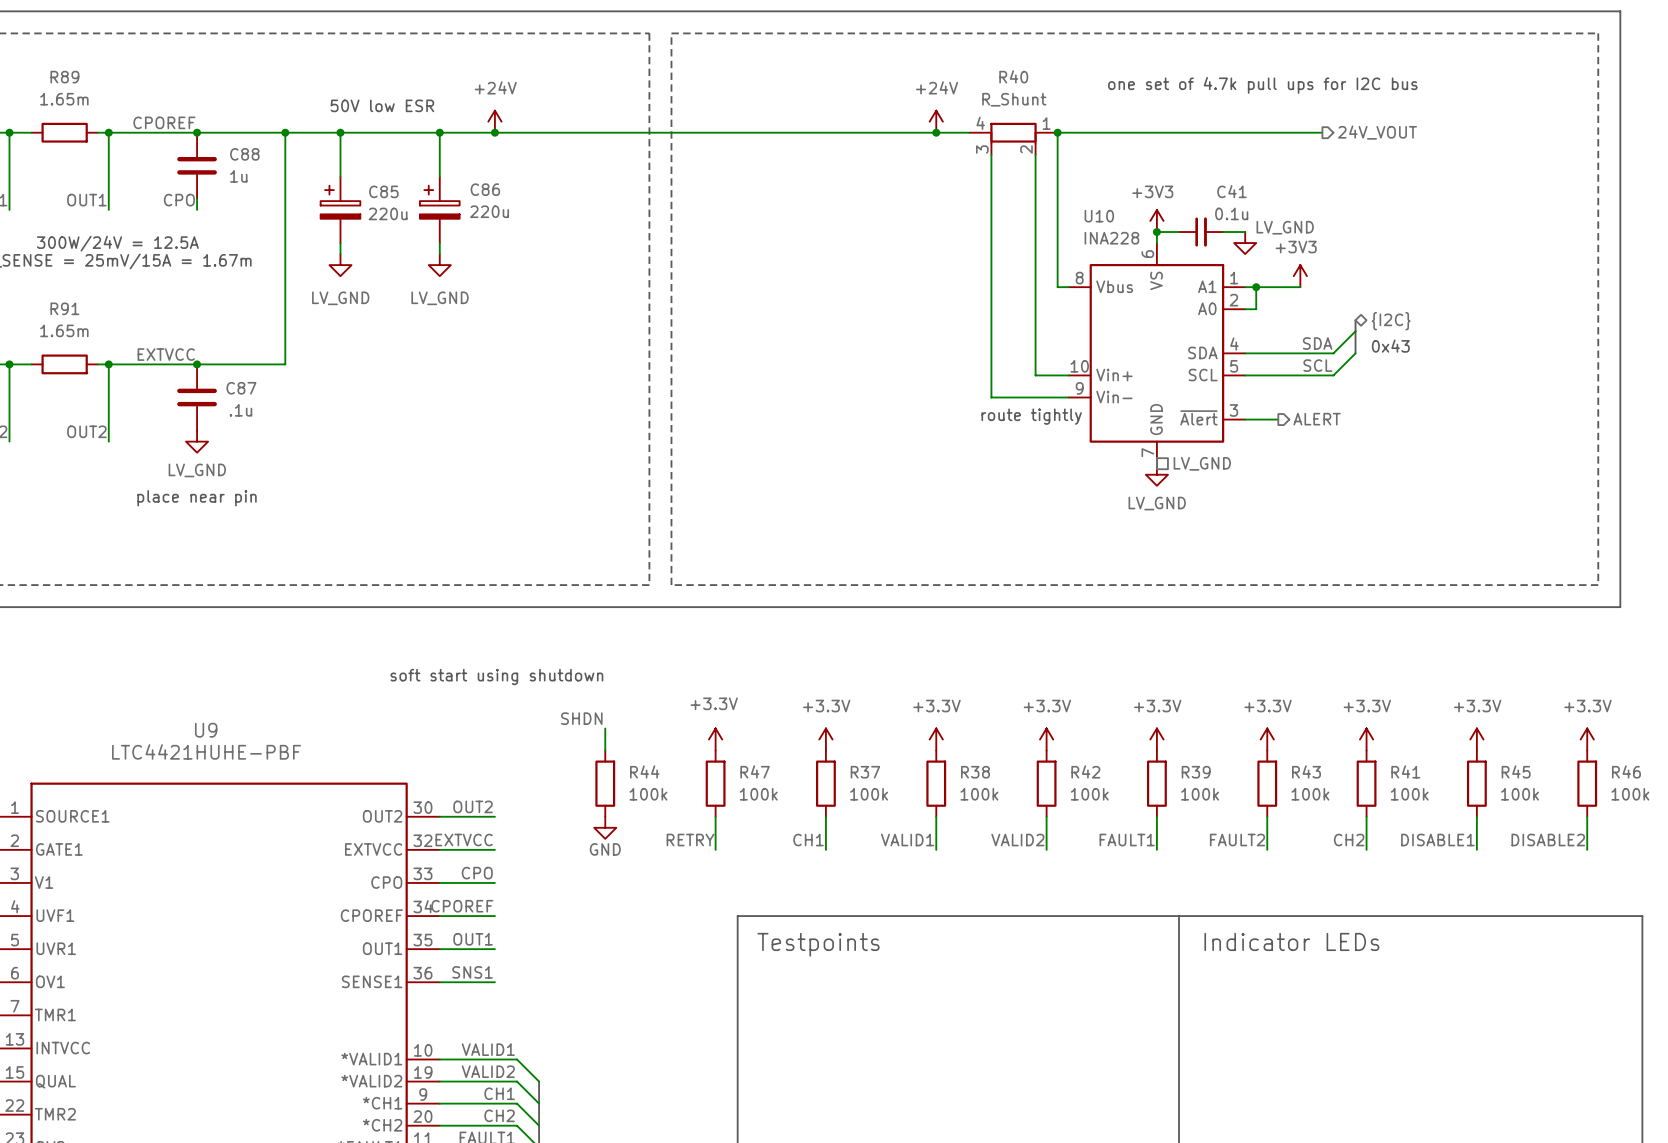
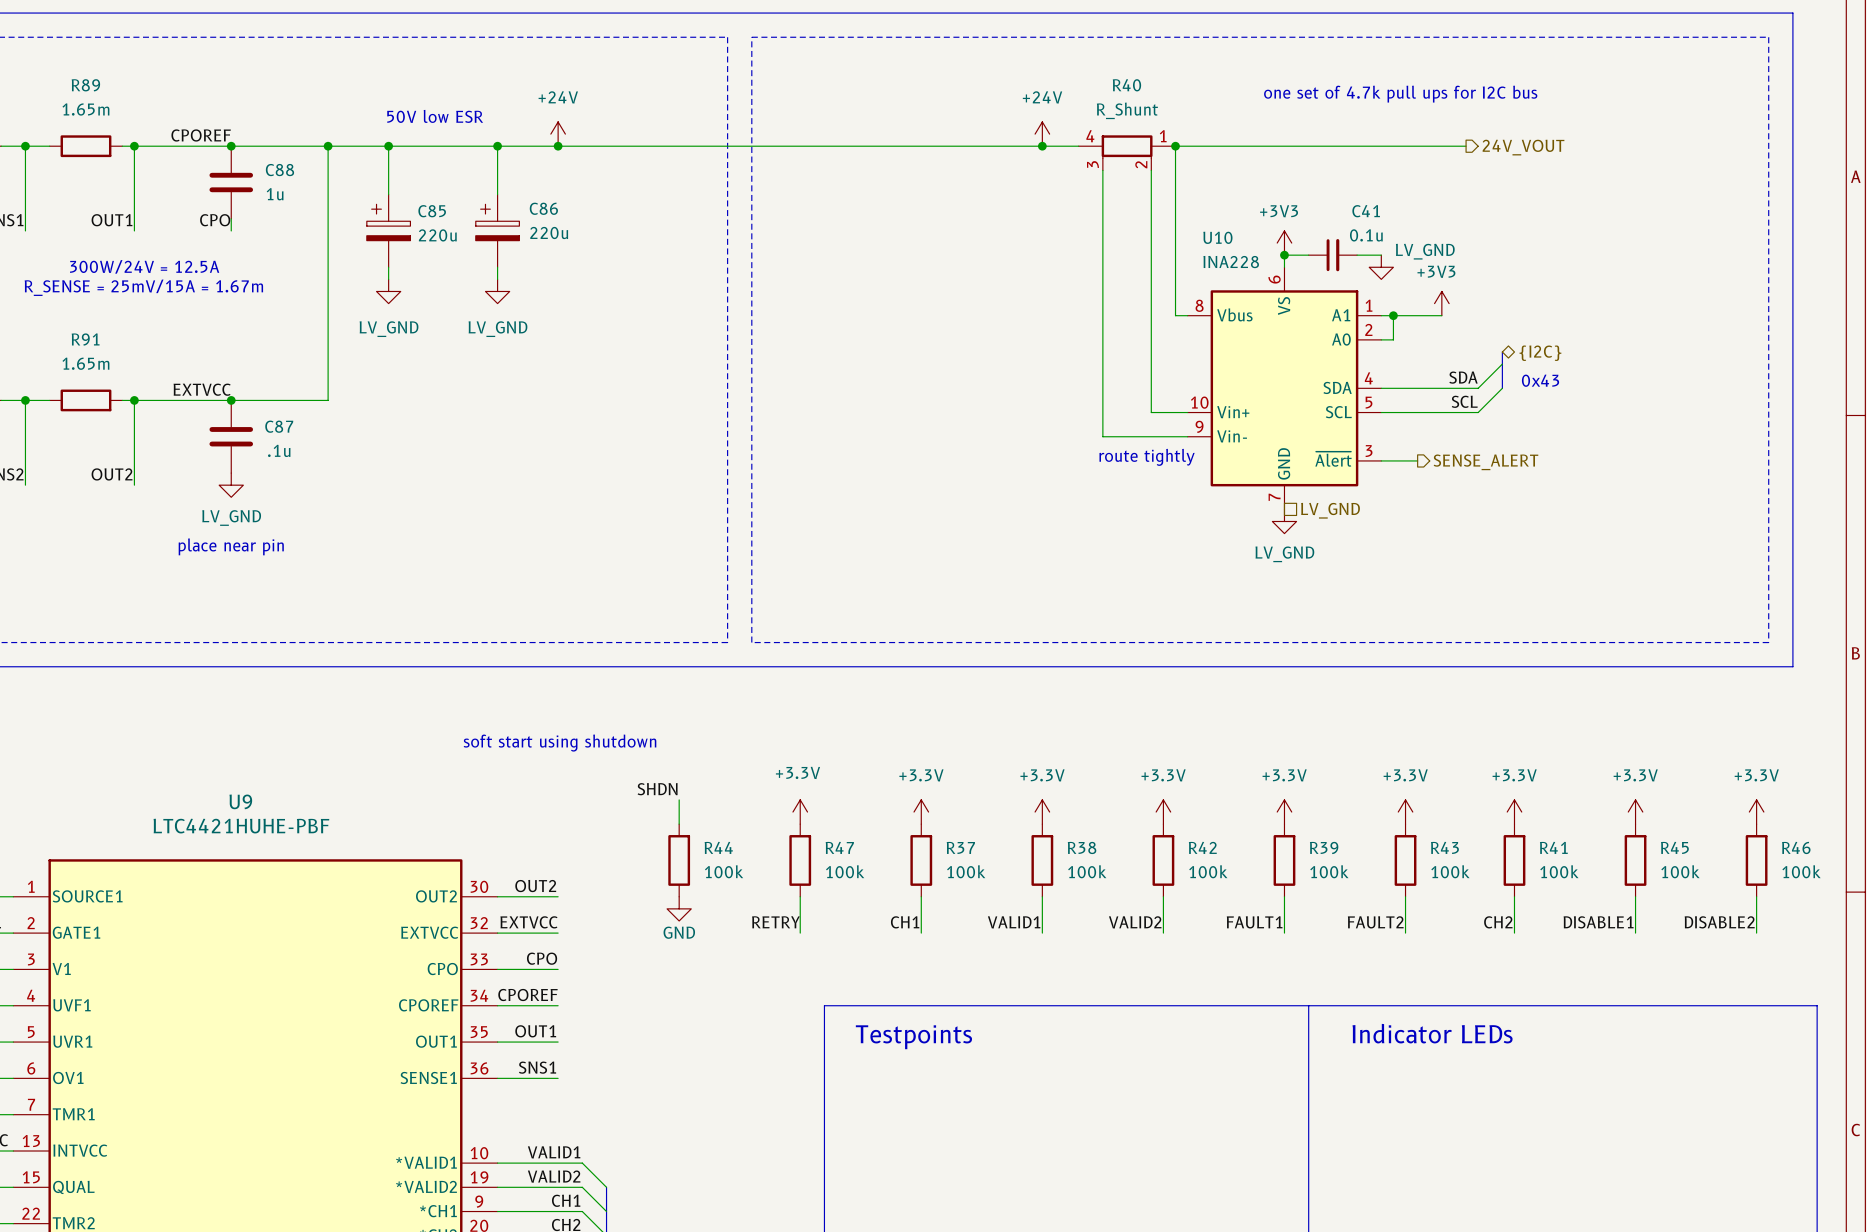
hierarchical label: ALERT (1317, 419) -> SENSE_ALERT (1485, 462)

